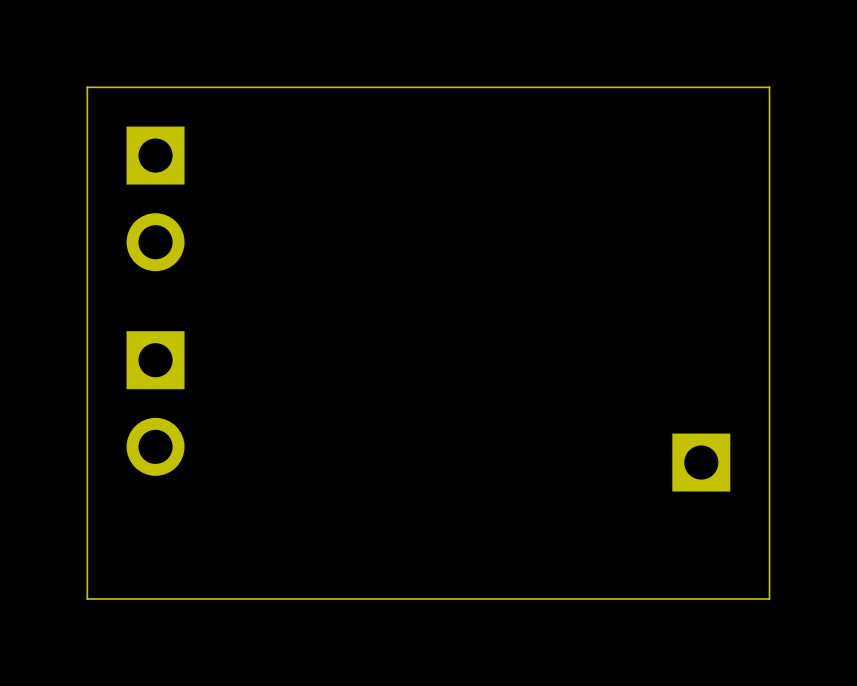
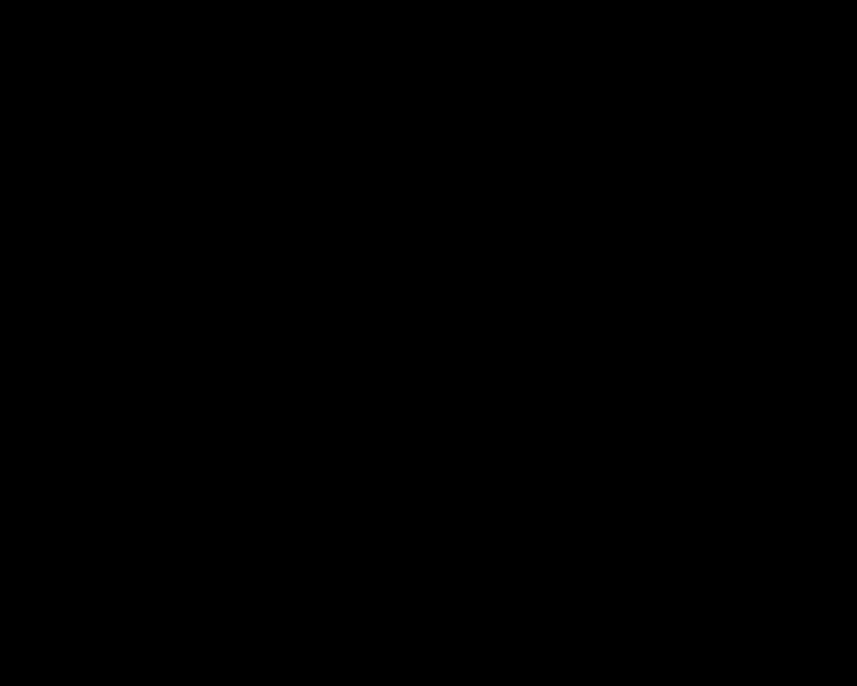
board edge: (769, 87) (769, 598) (87, 598) (87, 87) (769, 87) -> none
part: (155, 198) -> none
part: (155, 403) -> none
part: (701, 462) -> none

